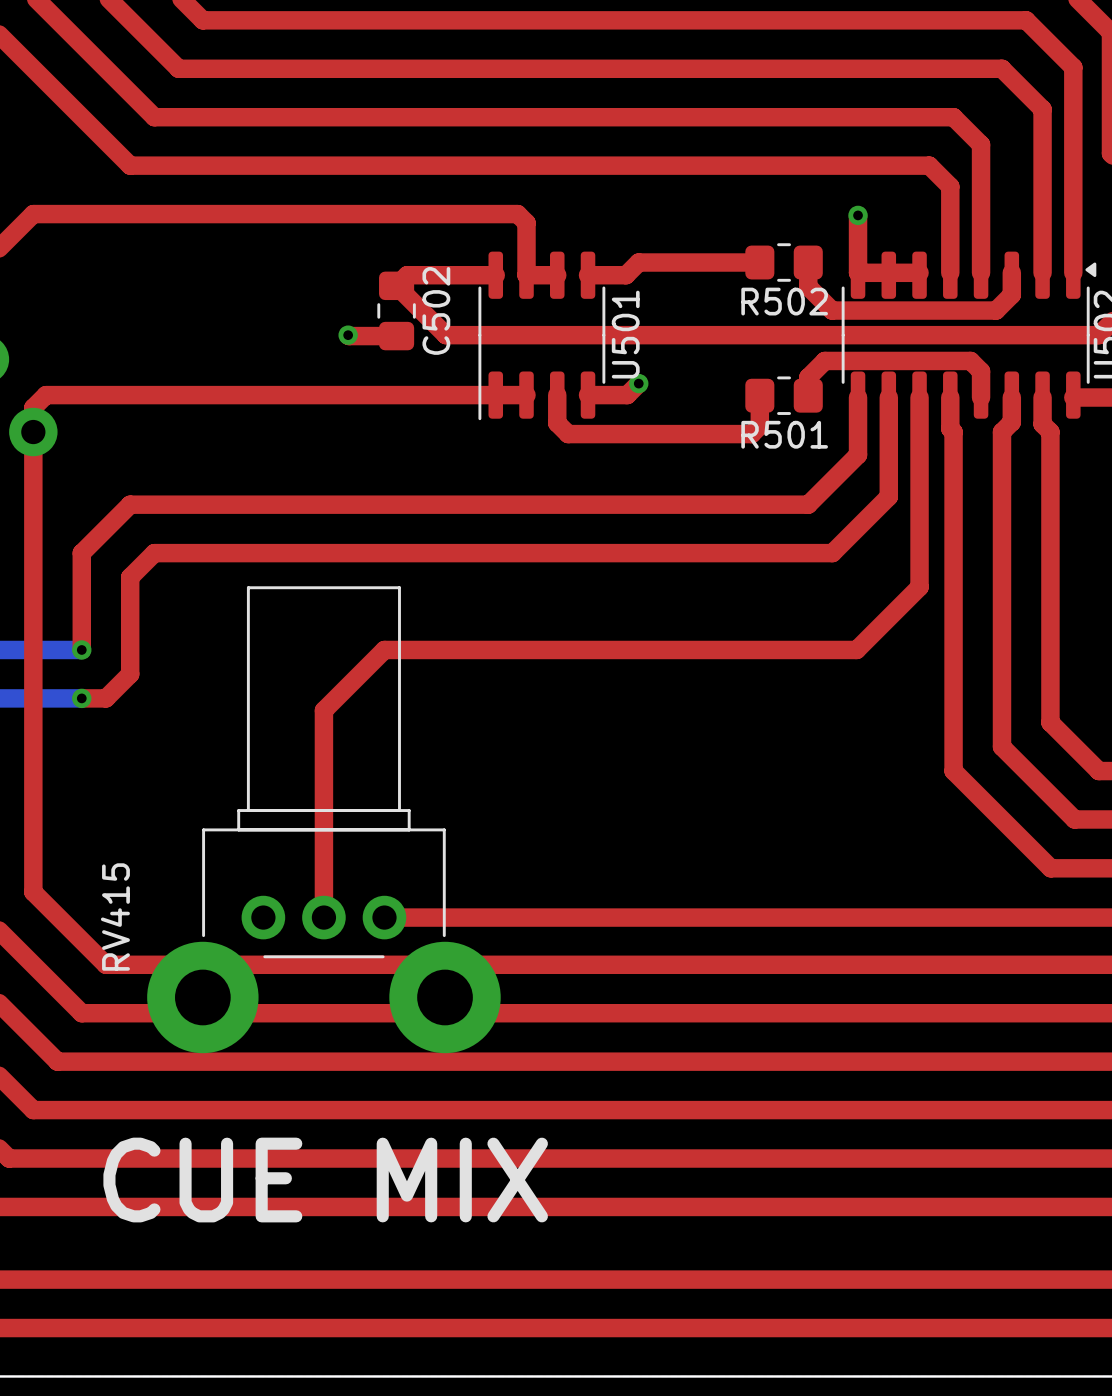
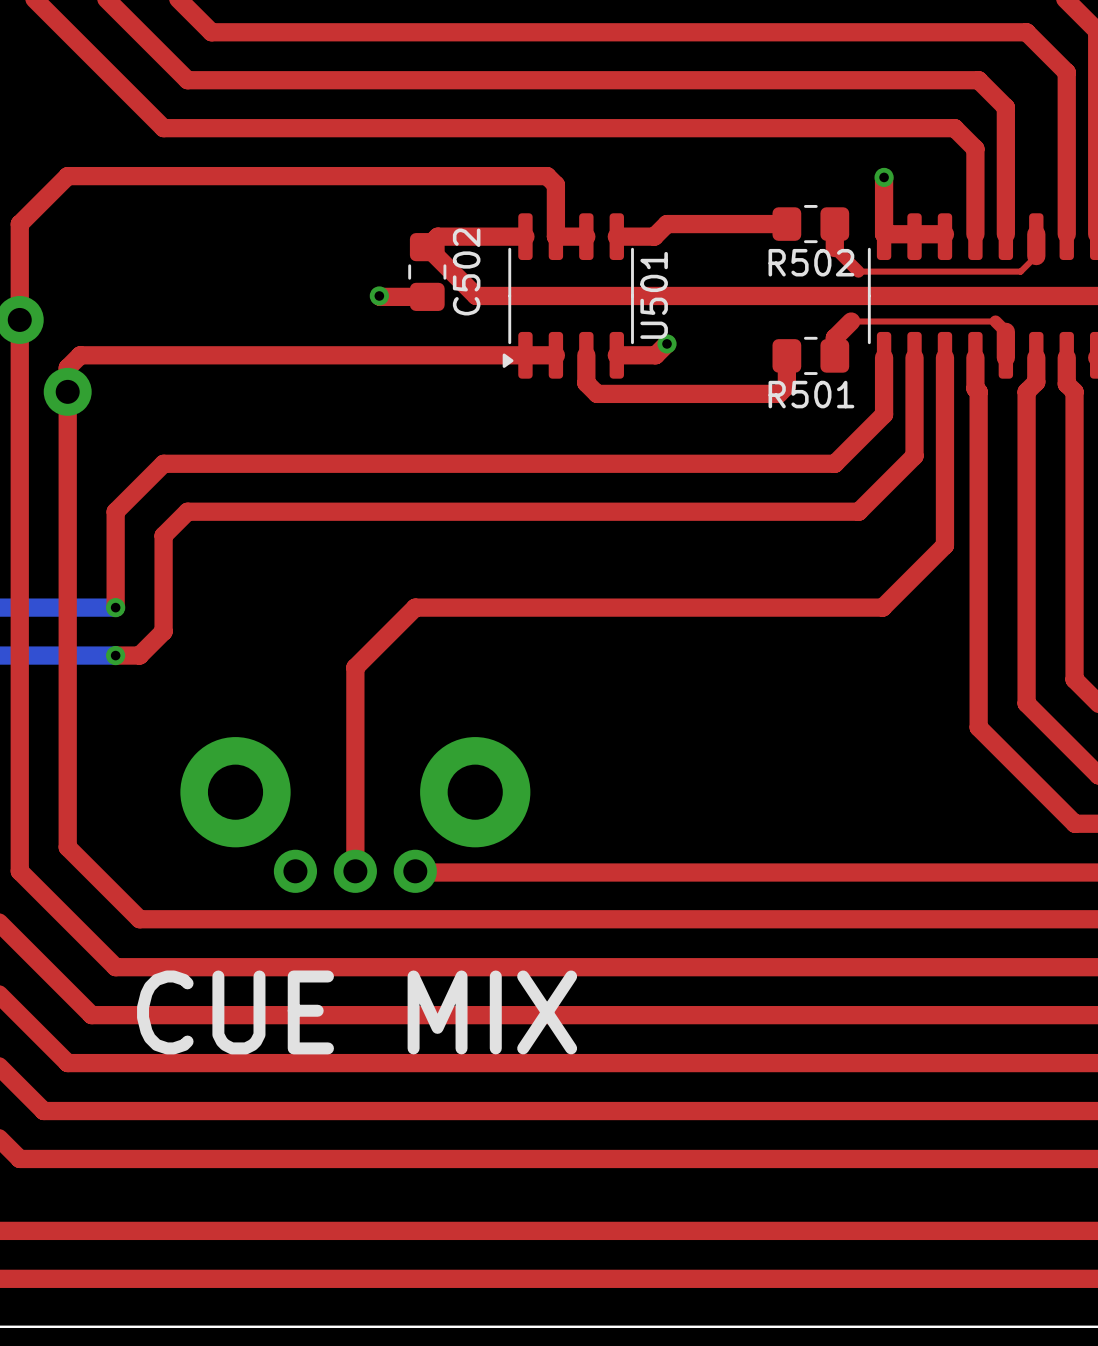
U501 footprint: [478, 251, 606, 421] -> [502, 213, 634, 379]
top track width: thick (808, 286) (832, 310) (996, 310) (1011, 294) -> thin (834, 248) (858, 271) (1020, 271) (1036, 256)
top track width: thick (824, 360) (970, 360) (981, 371) -> thin (851, 321) (995, 321) (1005, 331)
RV415 side: top (323, 819) -> bottom (355, 814)
text position: CUE MIX (325, 1180) -> CUE MIX (357, 1012)

